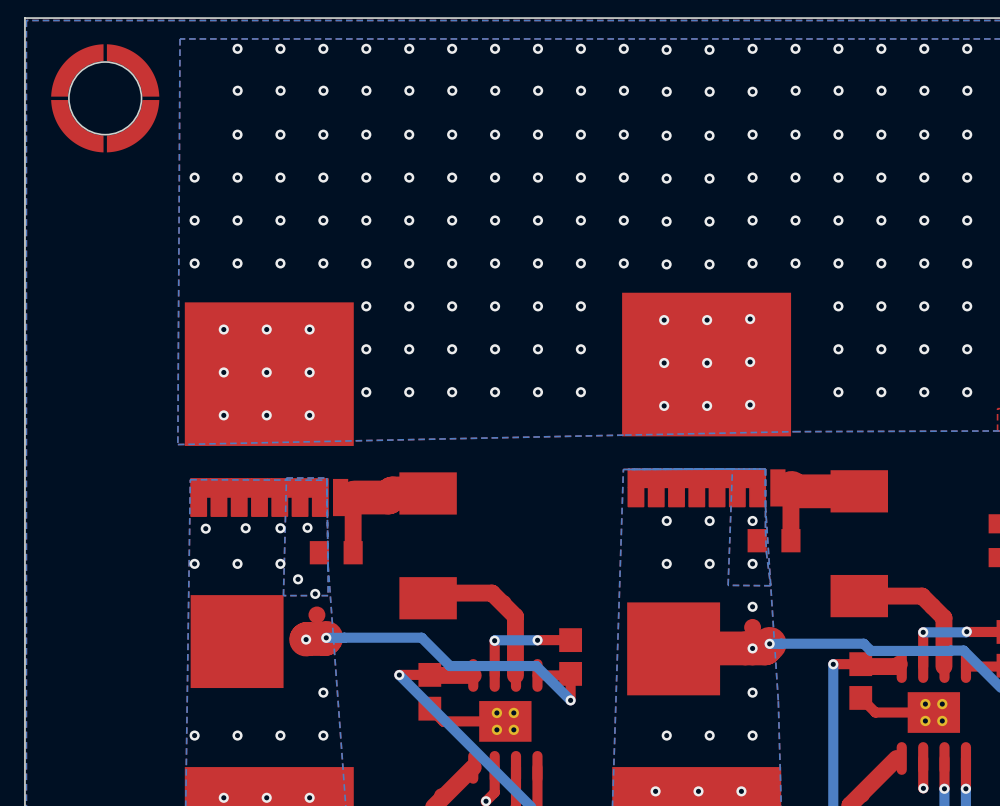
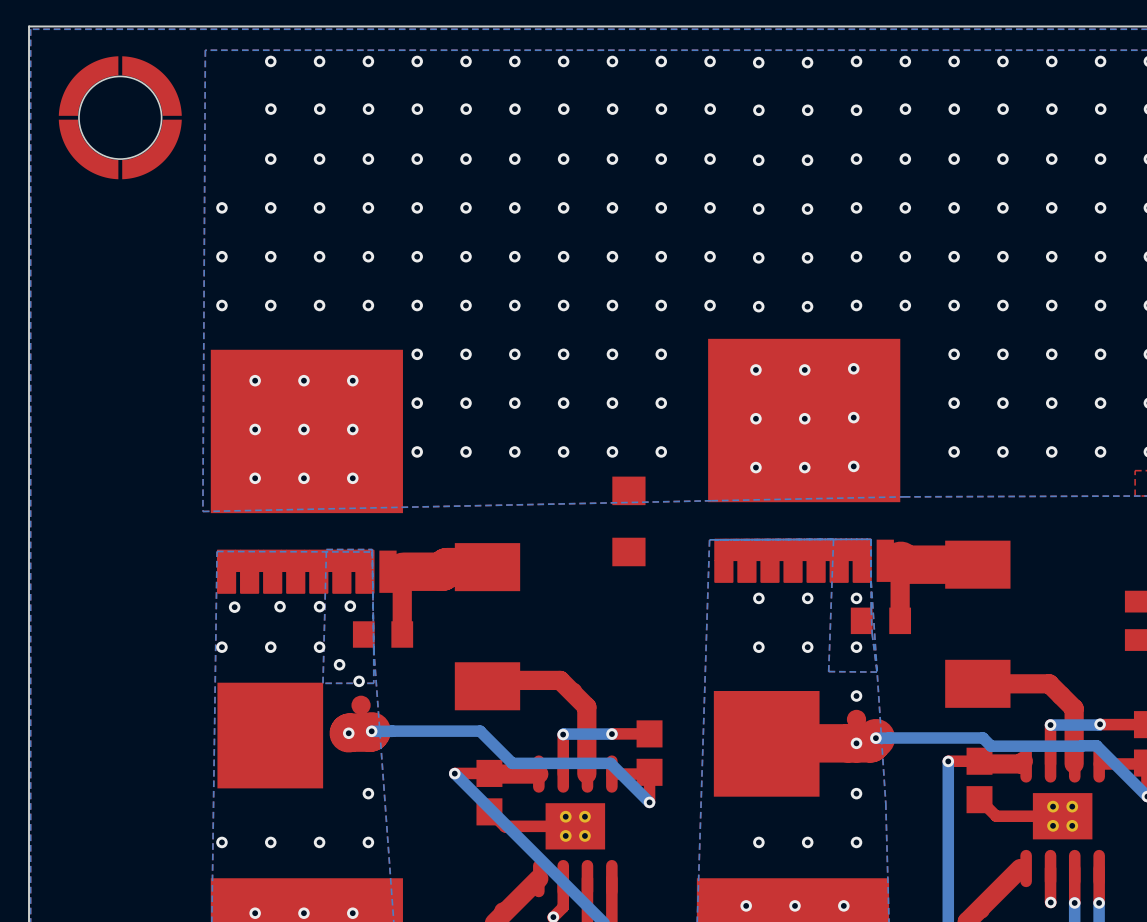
part: none -> (628, 521)

